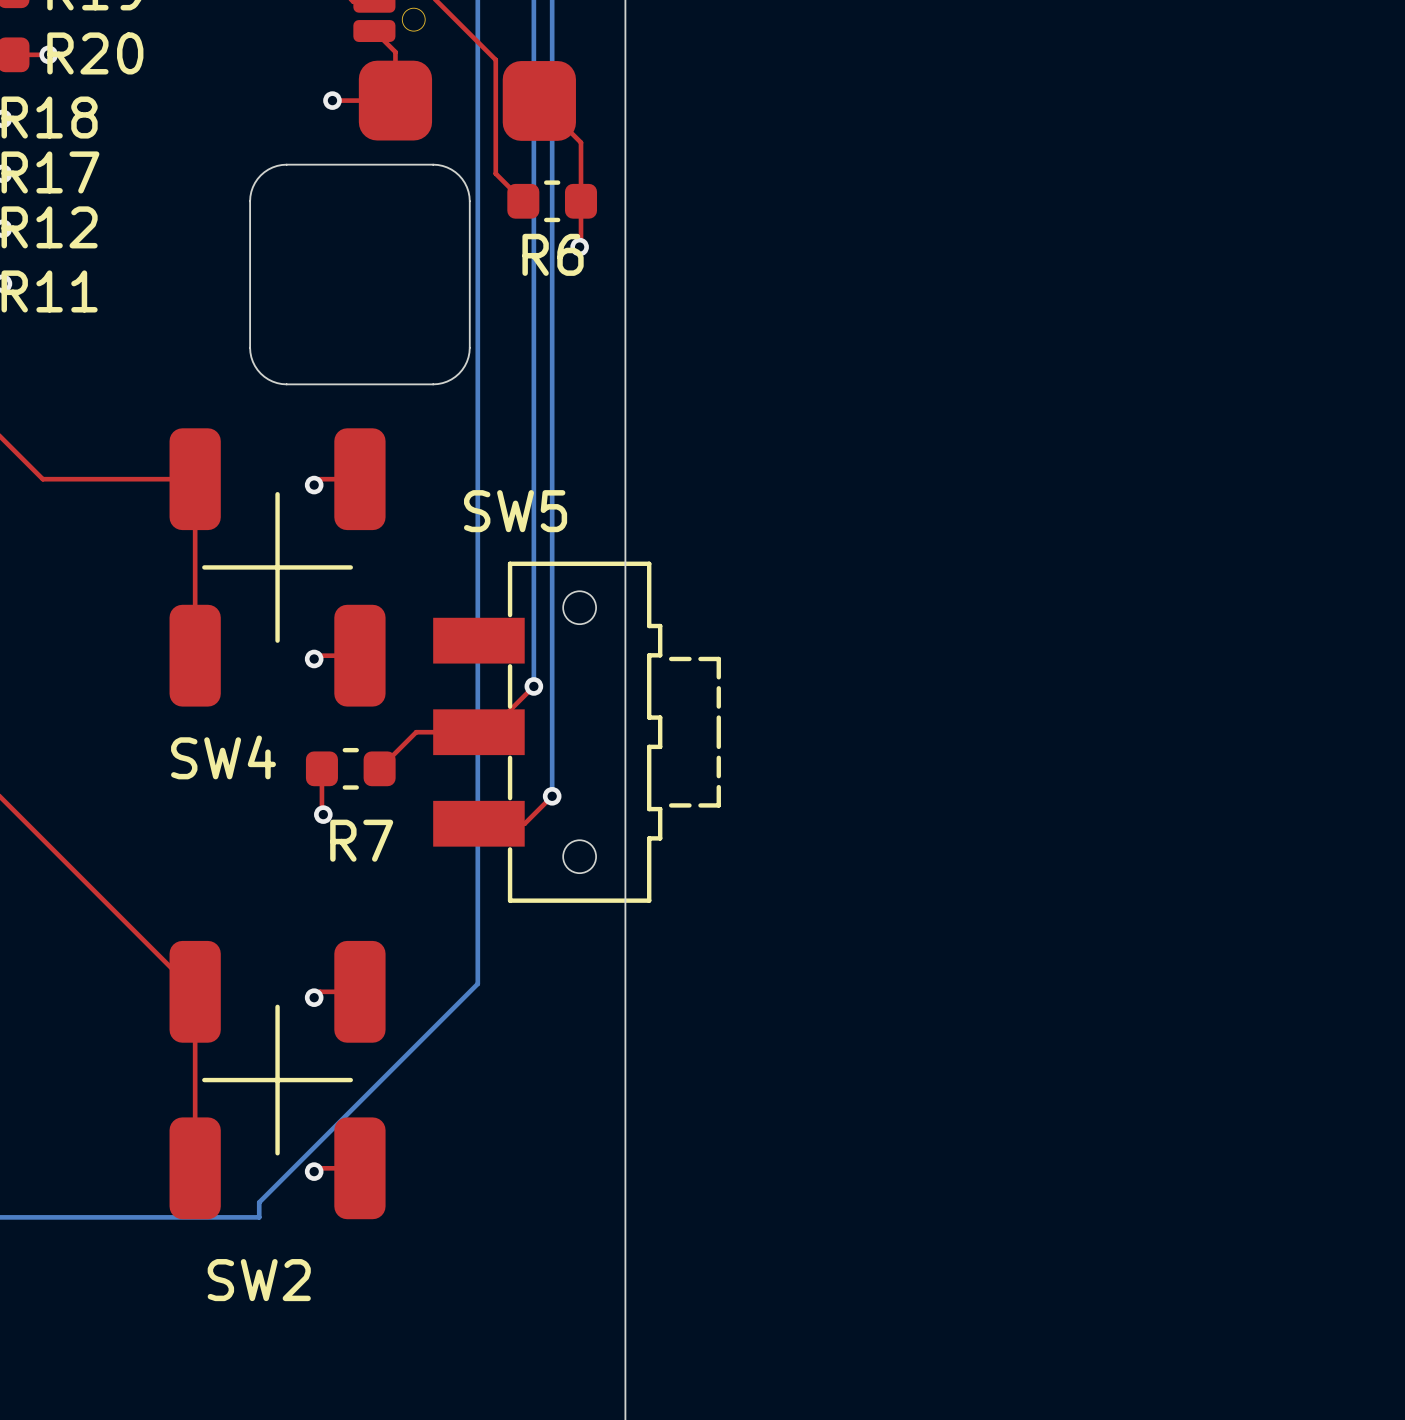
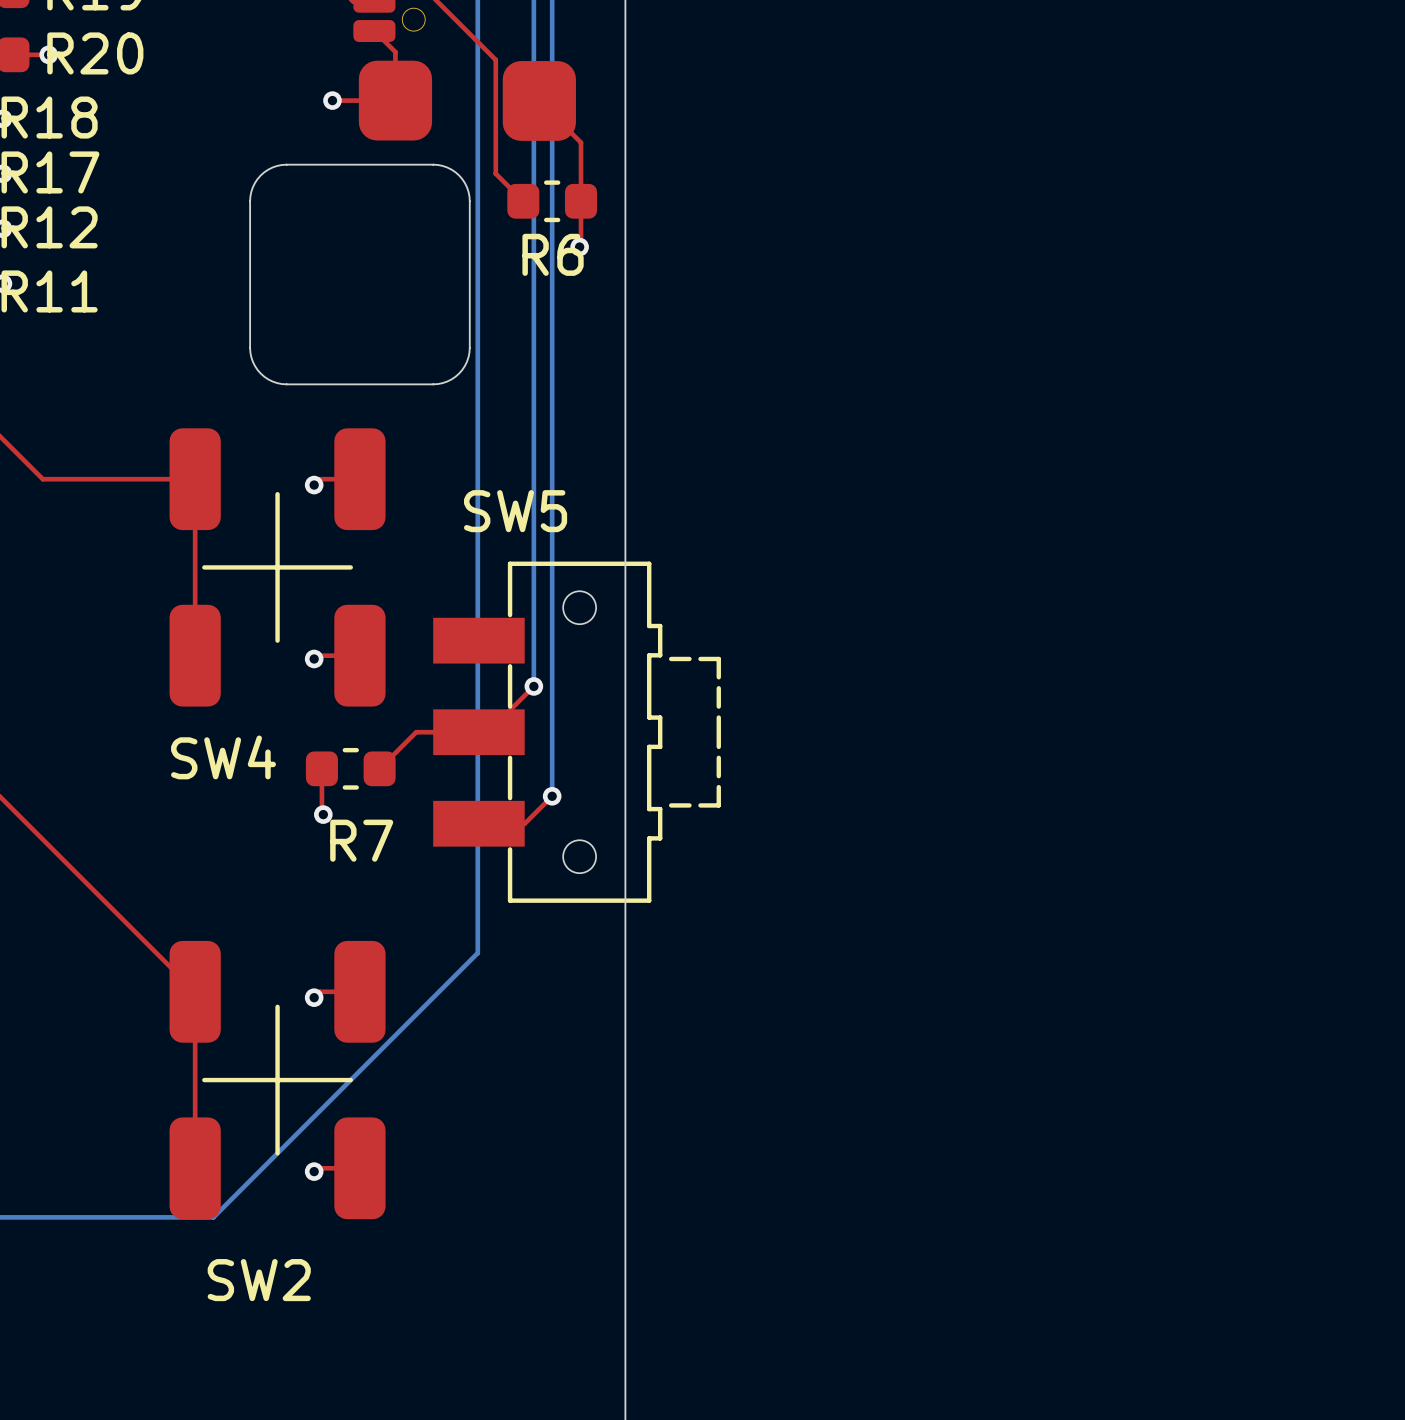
bottom track: (477, 953) (477, 983) (259, 1202) (259, 1217) (213, 1217) -> (477, 953) (213, 1217)

